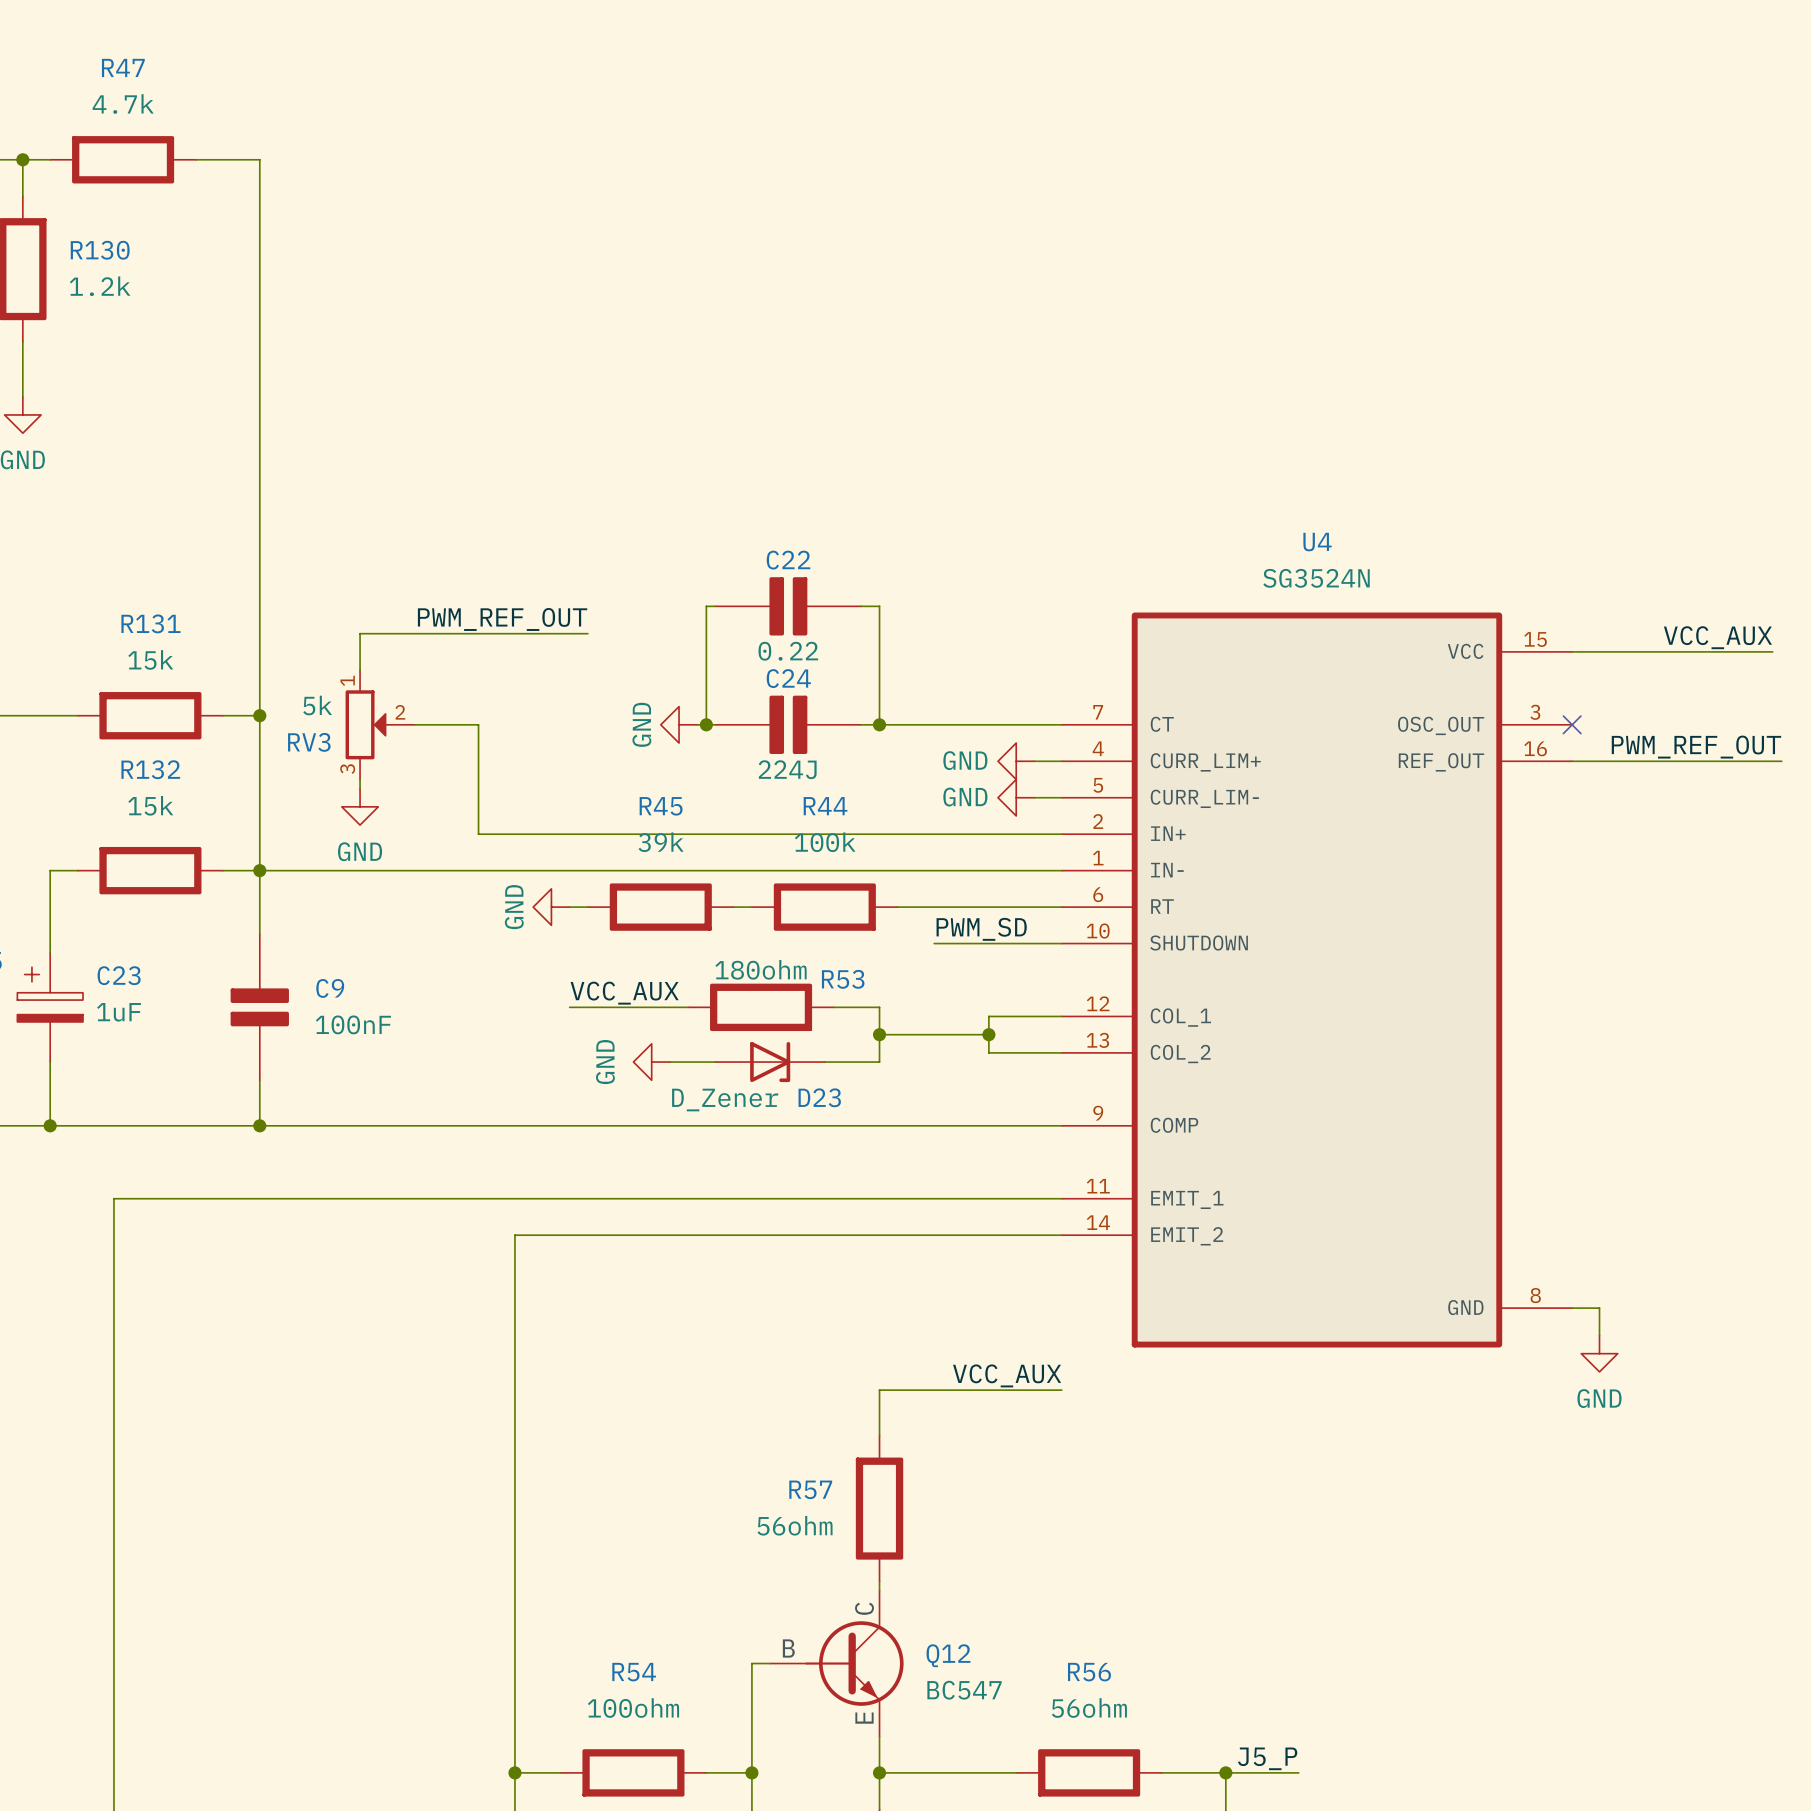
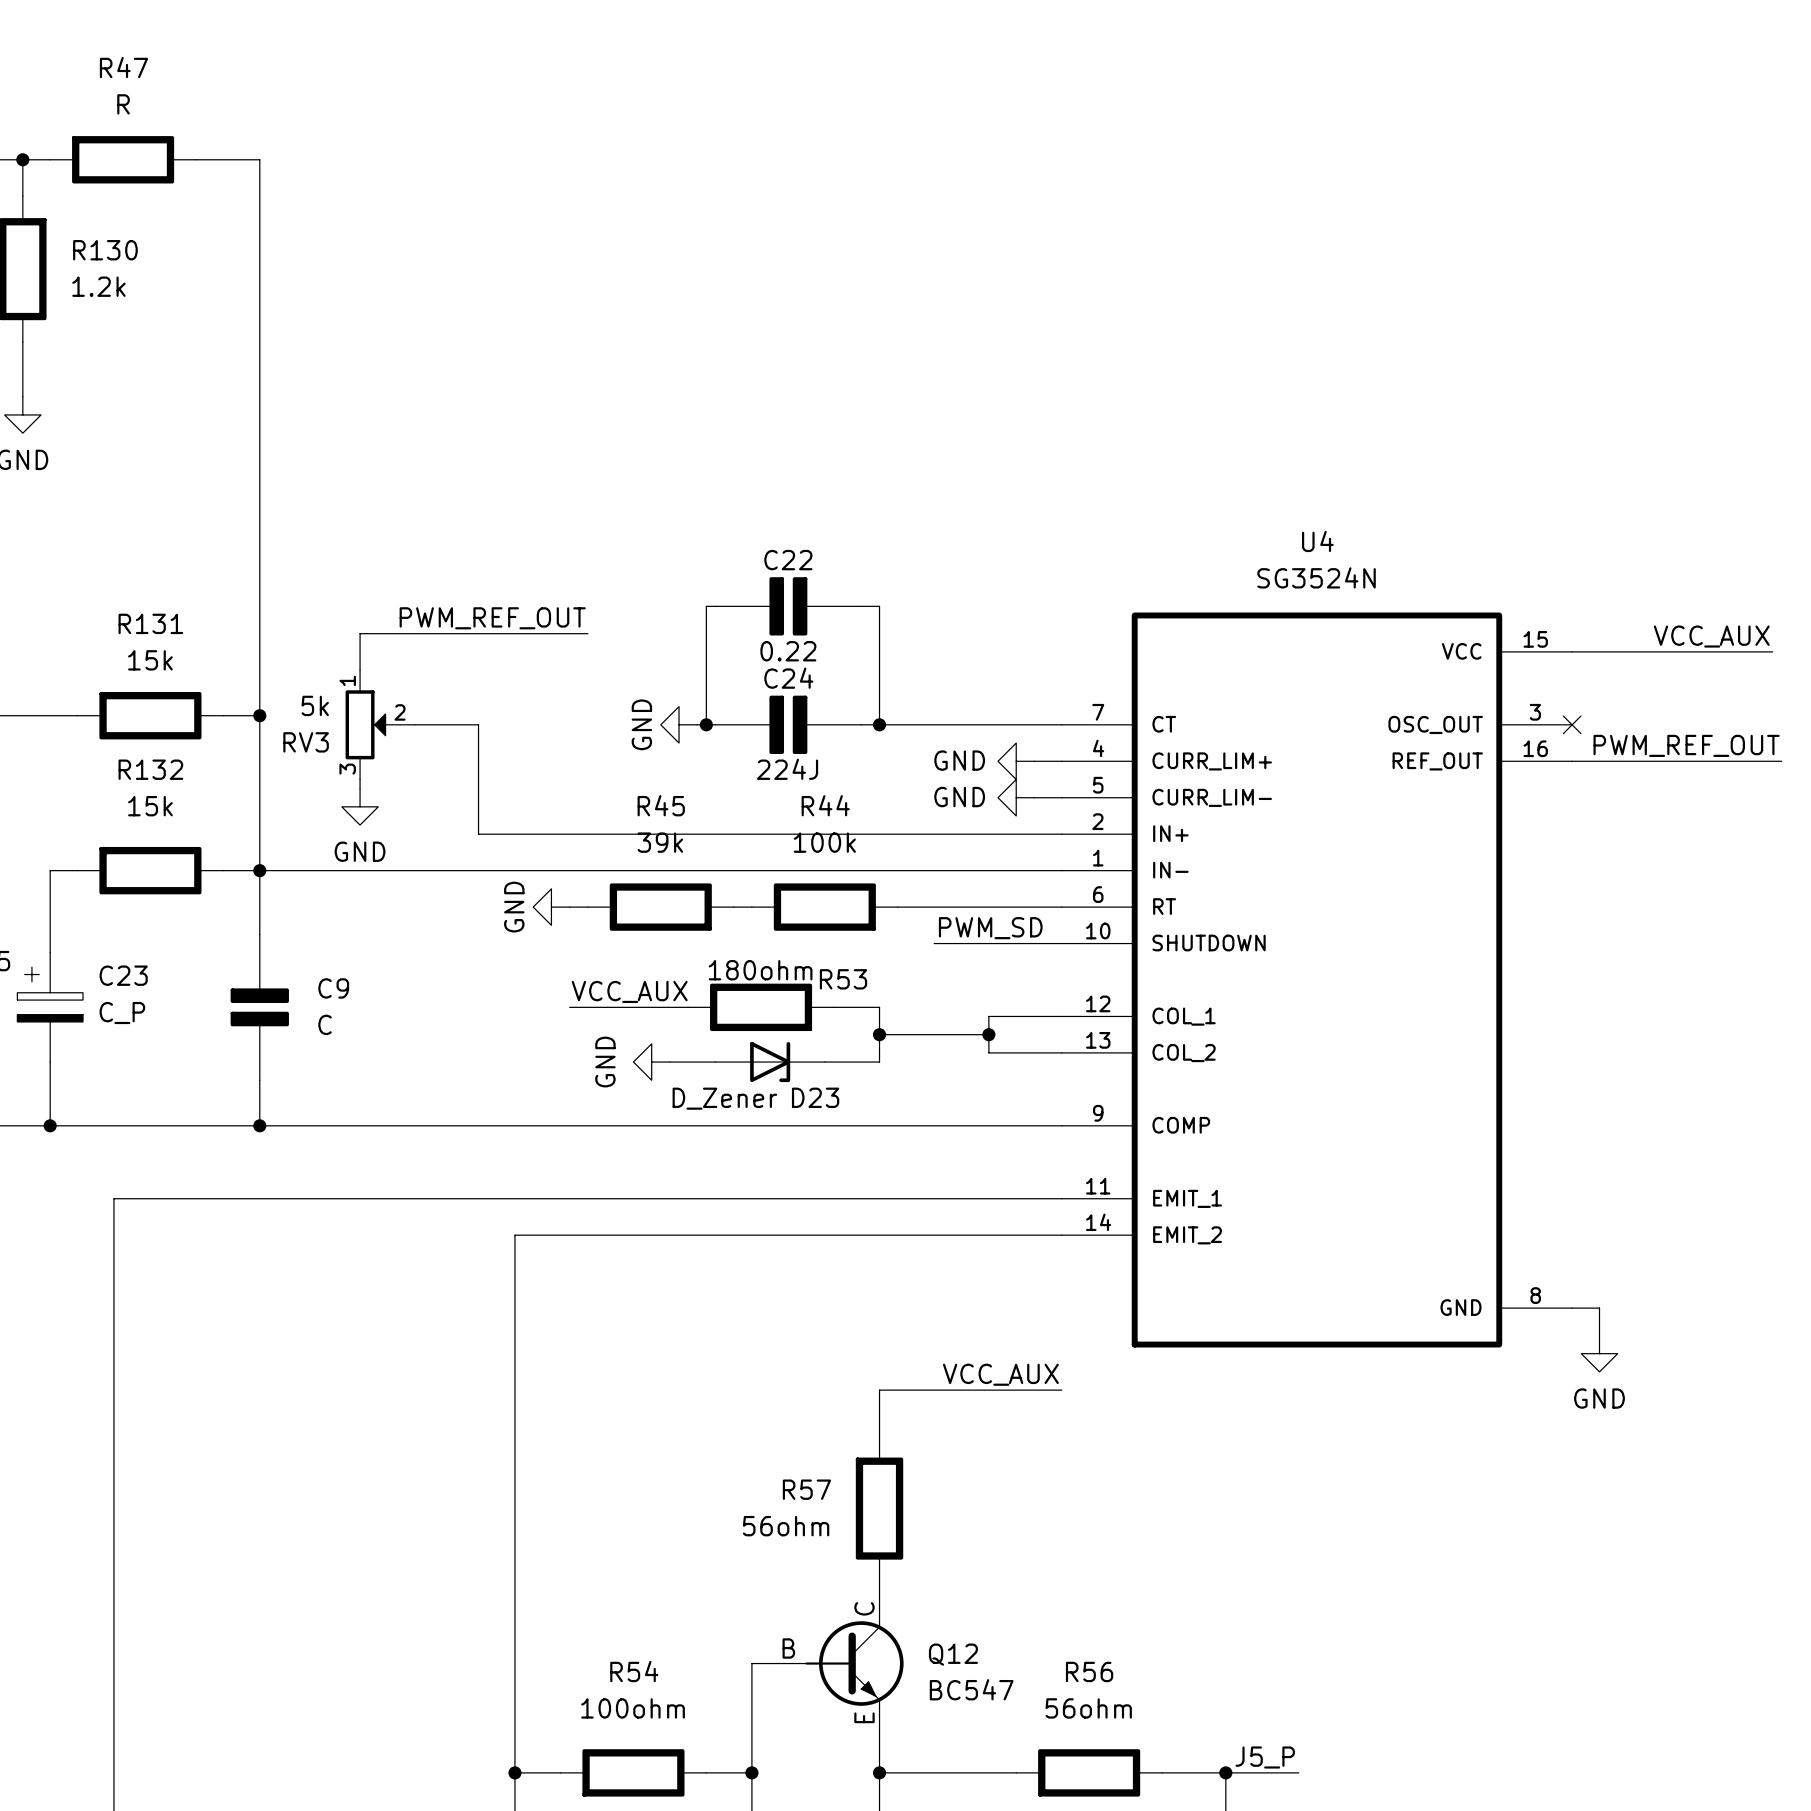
R47 value: 4.7k (123, 103) -> R (123, 104)
C23 value: 1uF (119, 1012) -> C_P (122, 1013)
C9 value: 100nF (353, 1024) -> C (325, 1024)

